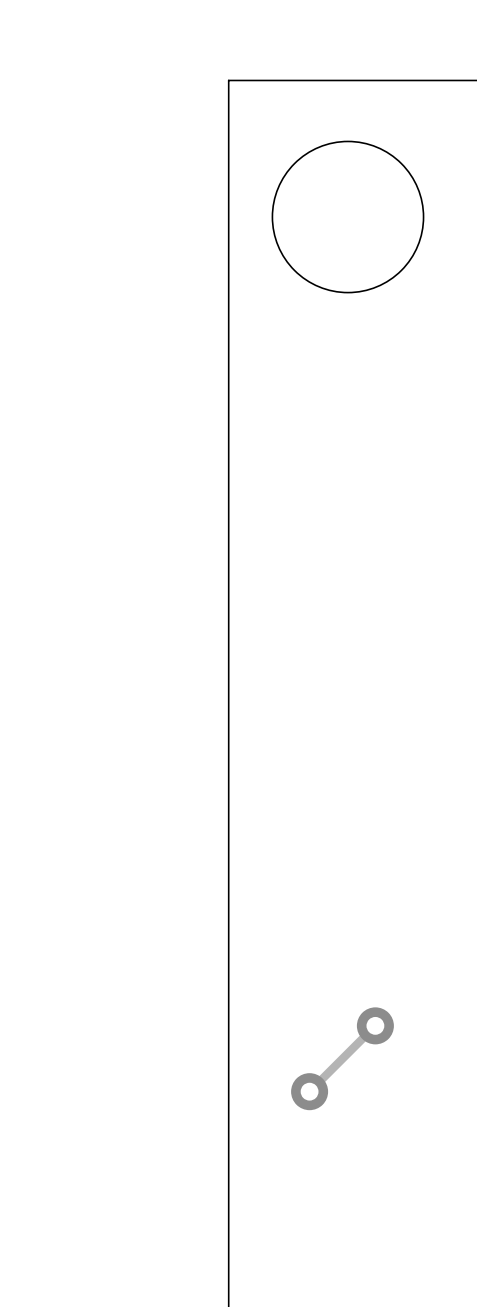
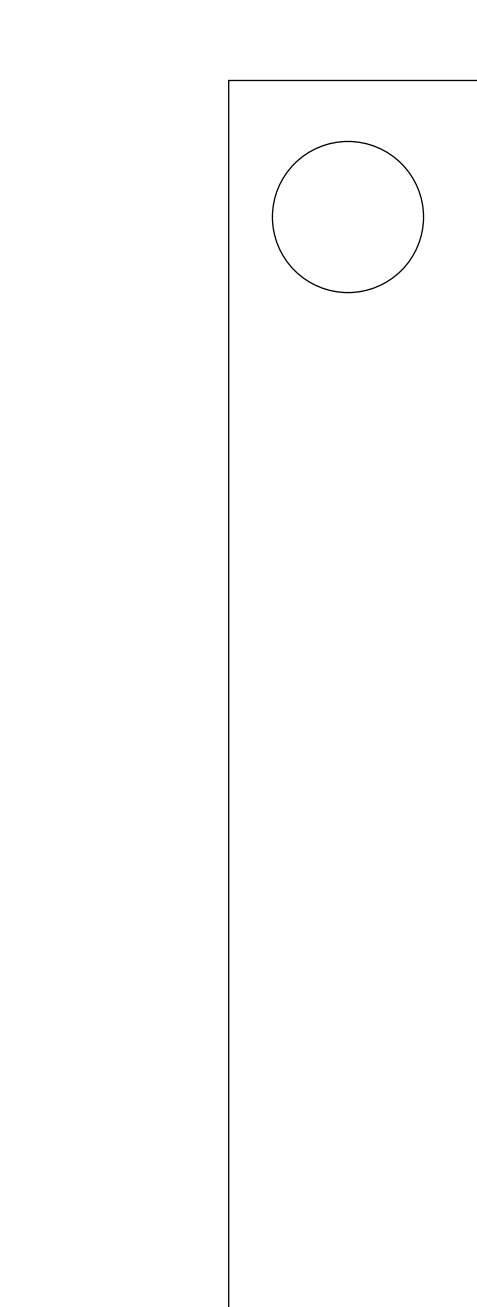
track: (375, 1025) (309, 1091) -> none
via: (375, 1025) -> none
via: (309, 1091) -> none

